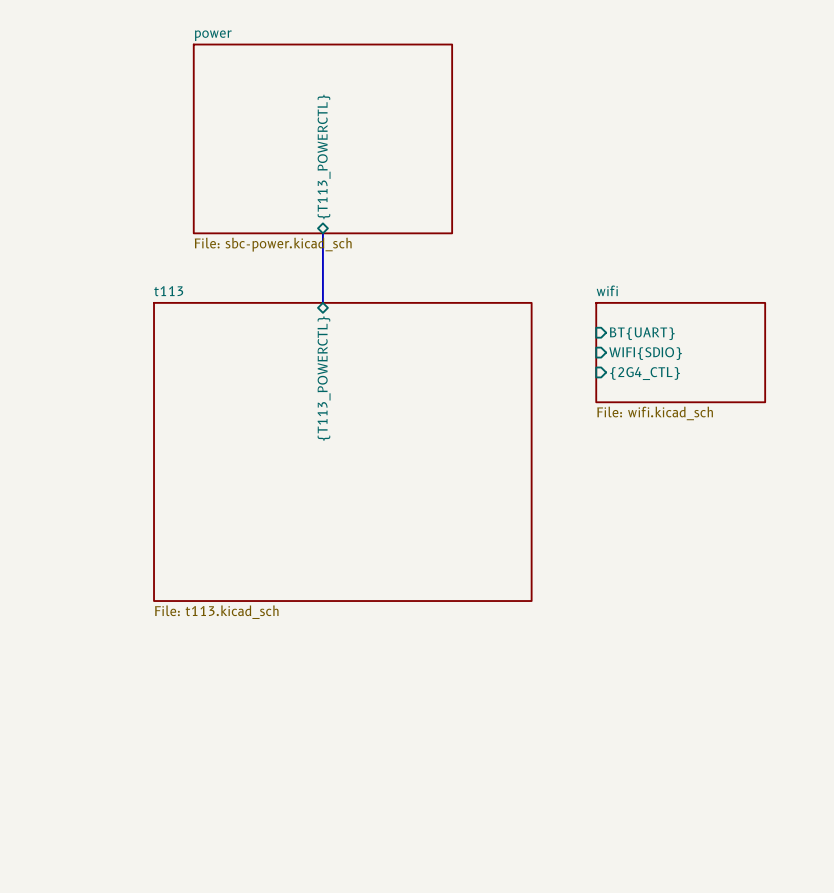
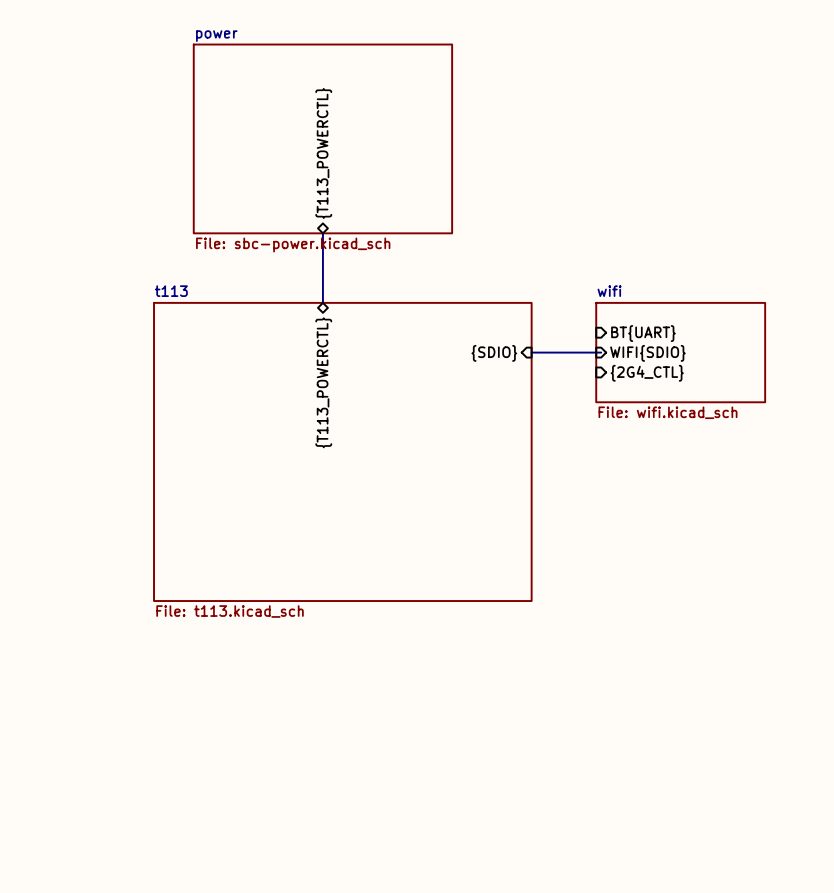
bus: none -> (531, 352) (601, 352)
sheet pin: none -> {SDIO} (494, 353)

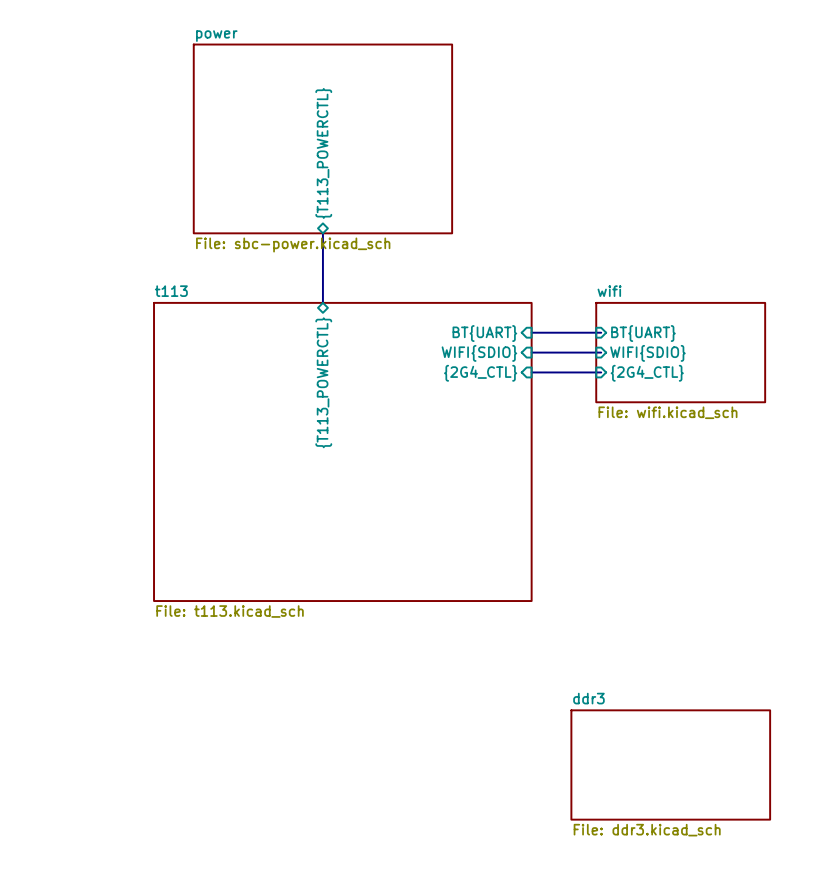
bus: none -> (531, 332) (601, 332)
sheet pin: none -> BT{UART} (484, 333)
sheet pin: {SDIO} (494, 353) -> WIFI{SDIO} (479, 353)
bus: none -> (531, 372) (601, 372)
sheet pin: none -> {2G4_CTL} (480, 373)
sheet ddr3: none -> File: ddr3.kicad_sch (670, 764)

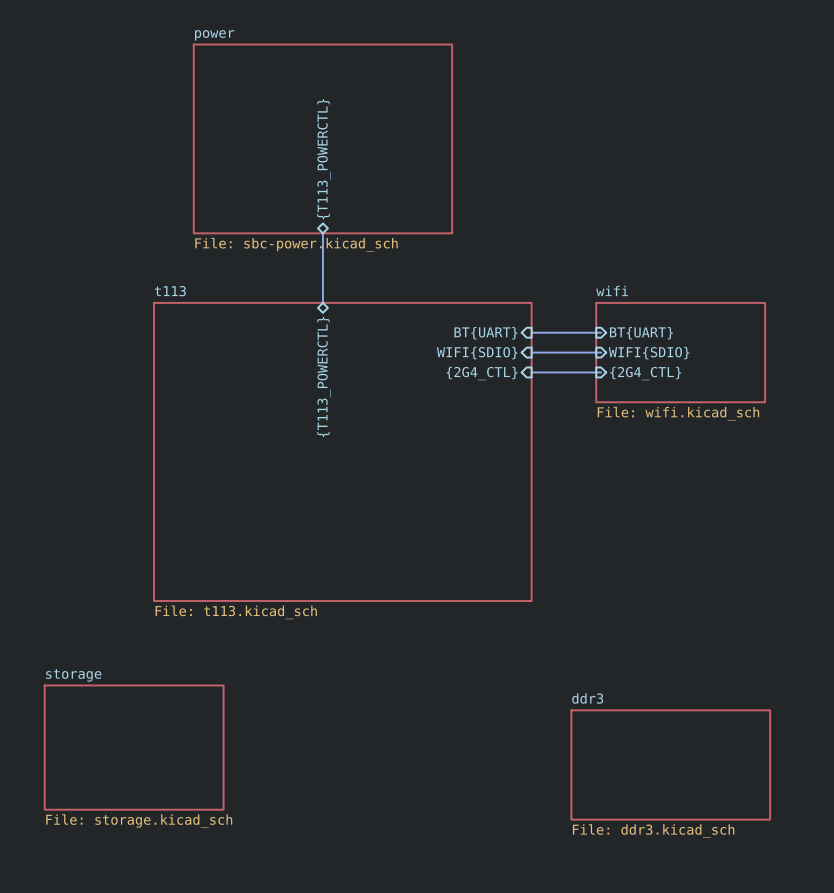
sheet storage: none -> File: storage.kicad_sch (134, 747)

